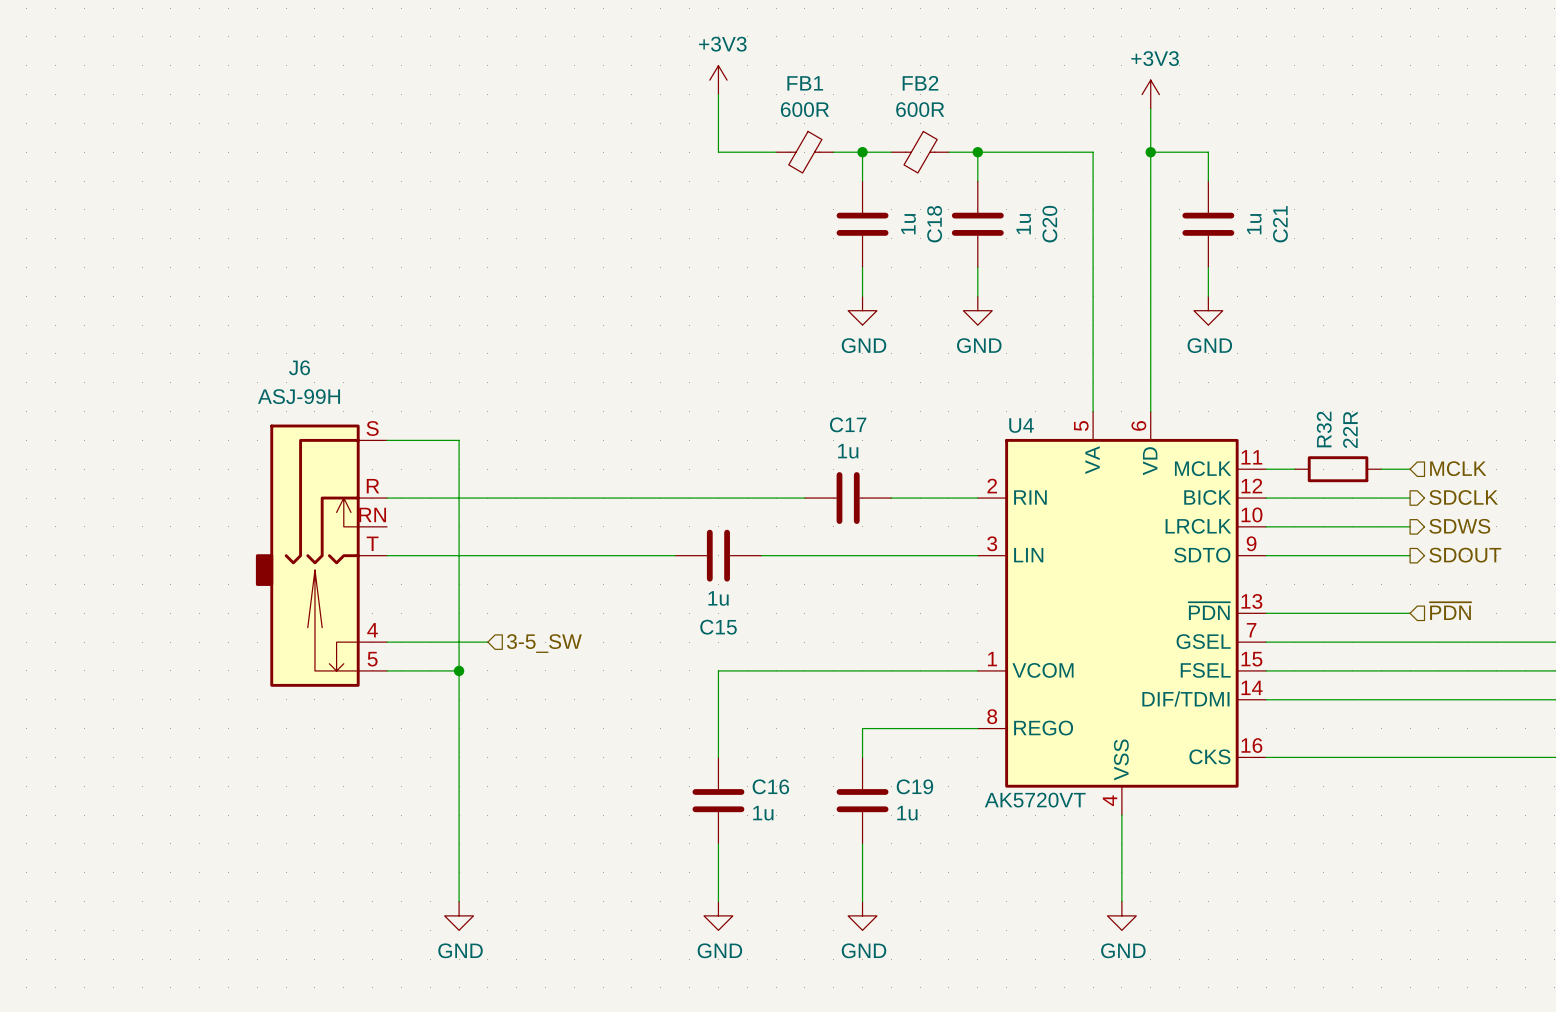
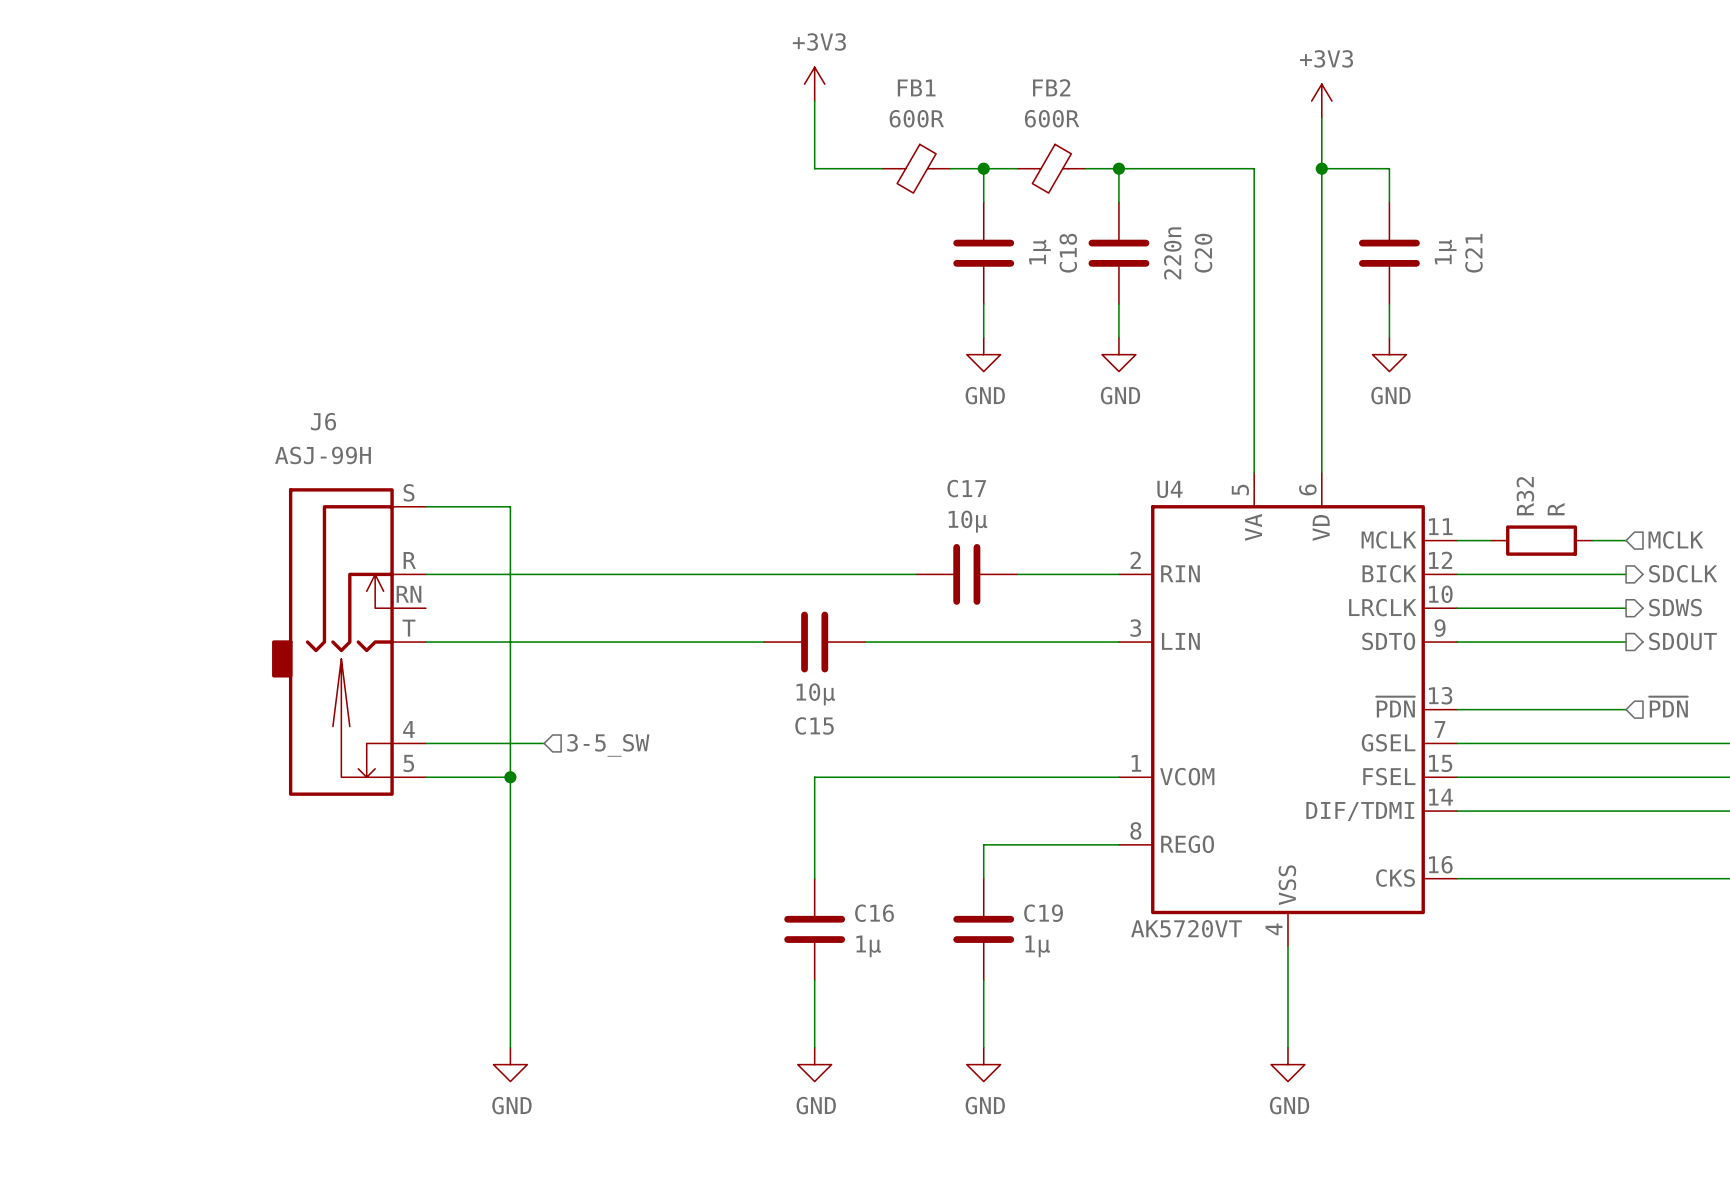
C18 value: 1u (908, 224) -> 1µ (1039, 252)
C20 value: 1u (1023, 224) -> 220n (1172, 253)
C21 value: 1u (1254, 224) -> 1µ (1445, 252)
R32 value: 22R (1350, 429) -> R (1556, 509)
C17 value: 1u (848, 451) -> 10µ (967, 521)
C15 value: 1u (718, 598) -> 10µ (815, 694)
C16 value: 1u (763, 813) -> 1µ (868, 946)
C19 value: 1u (907, 813) -> 1µ (1037, 946)

